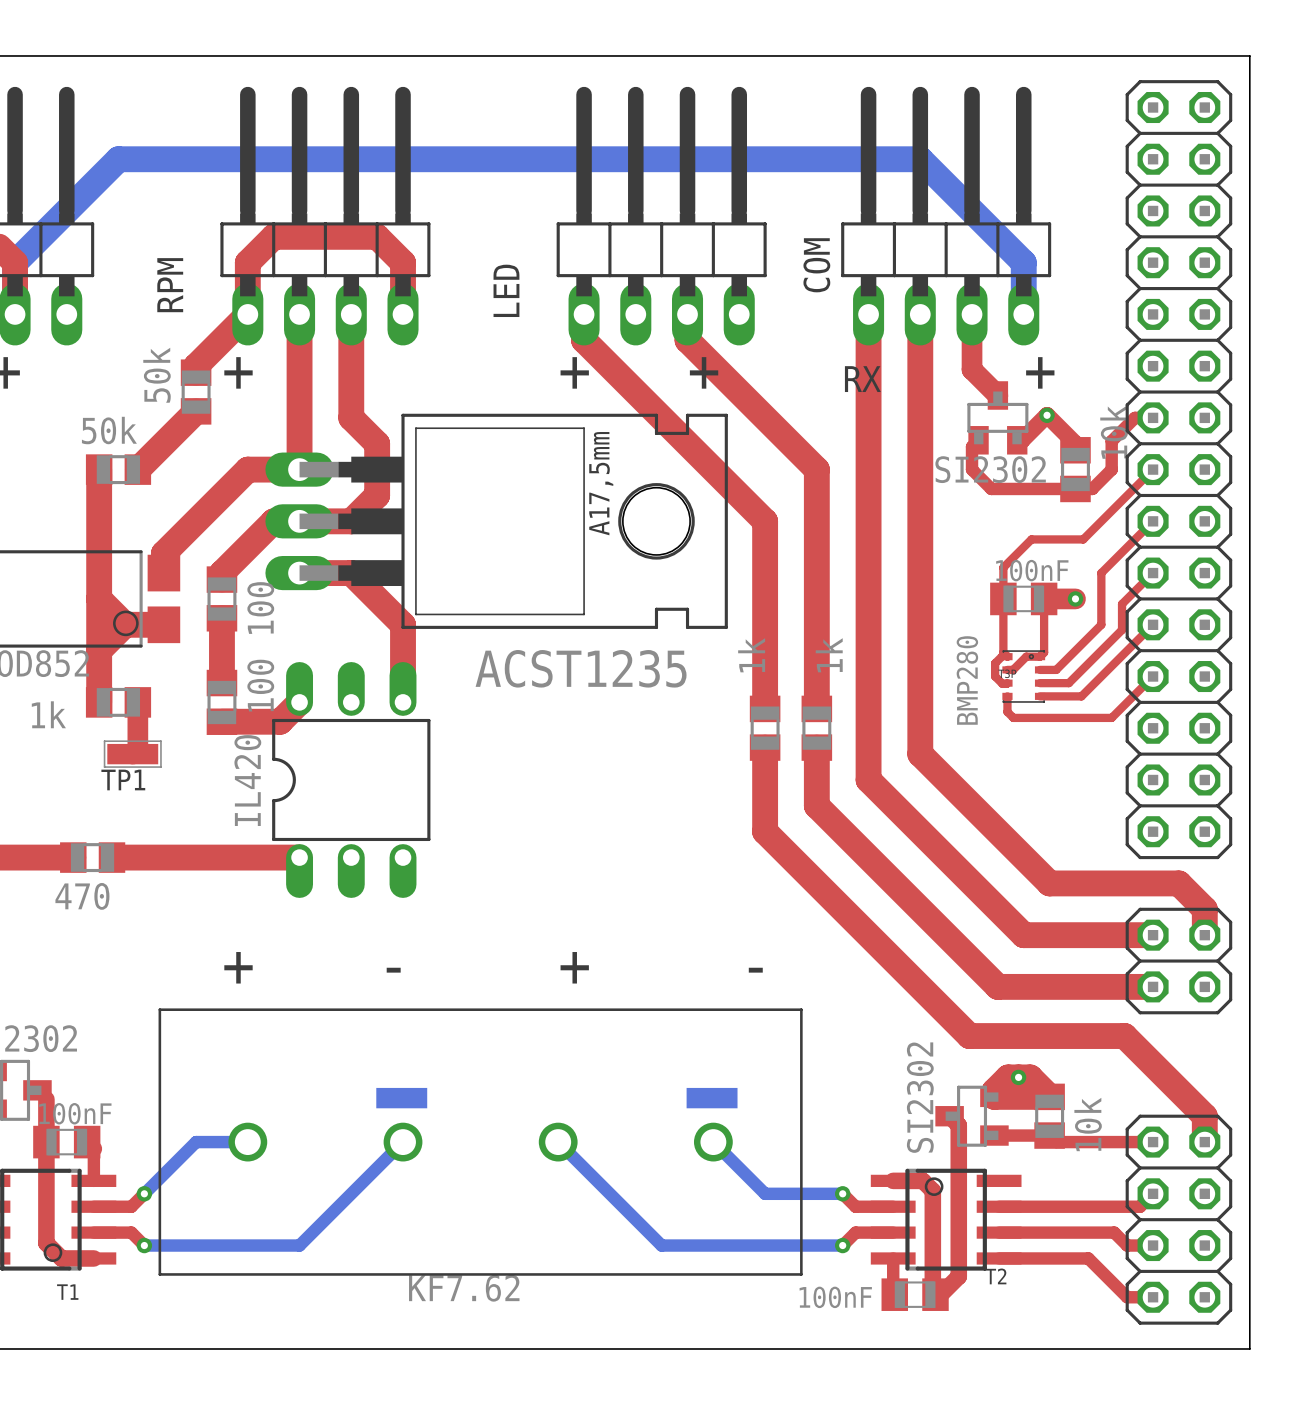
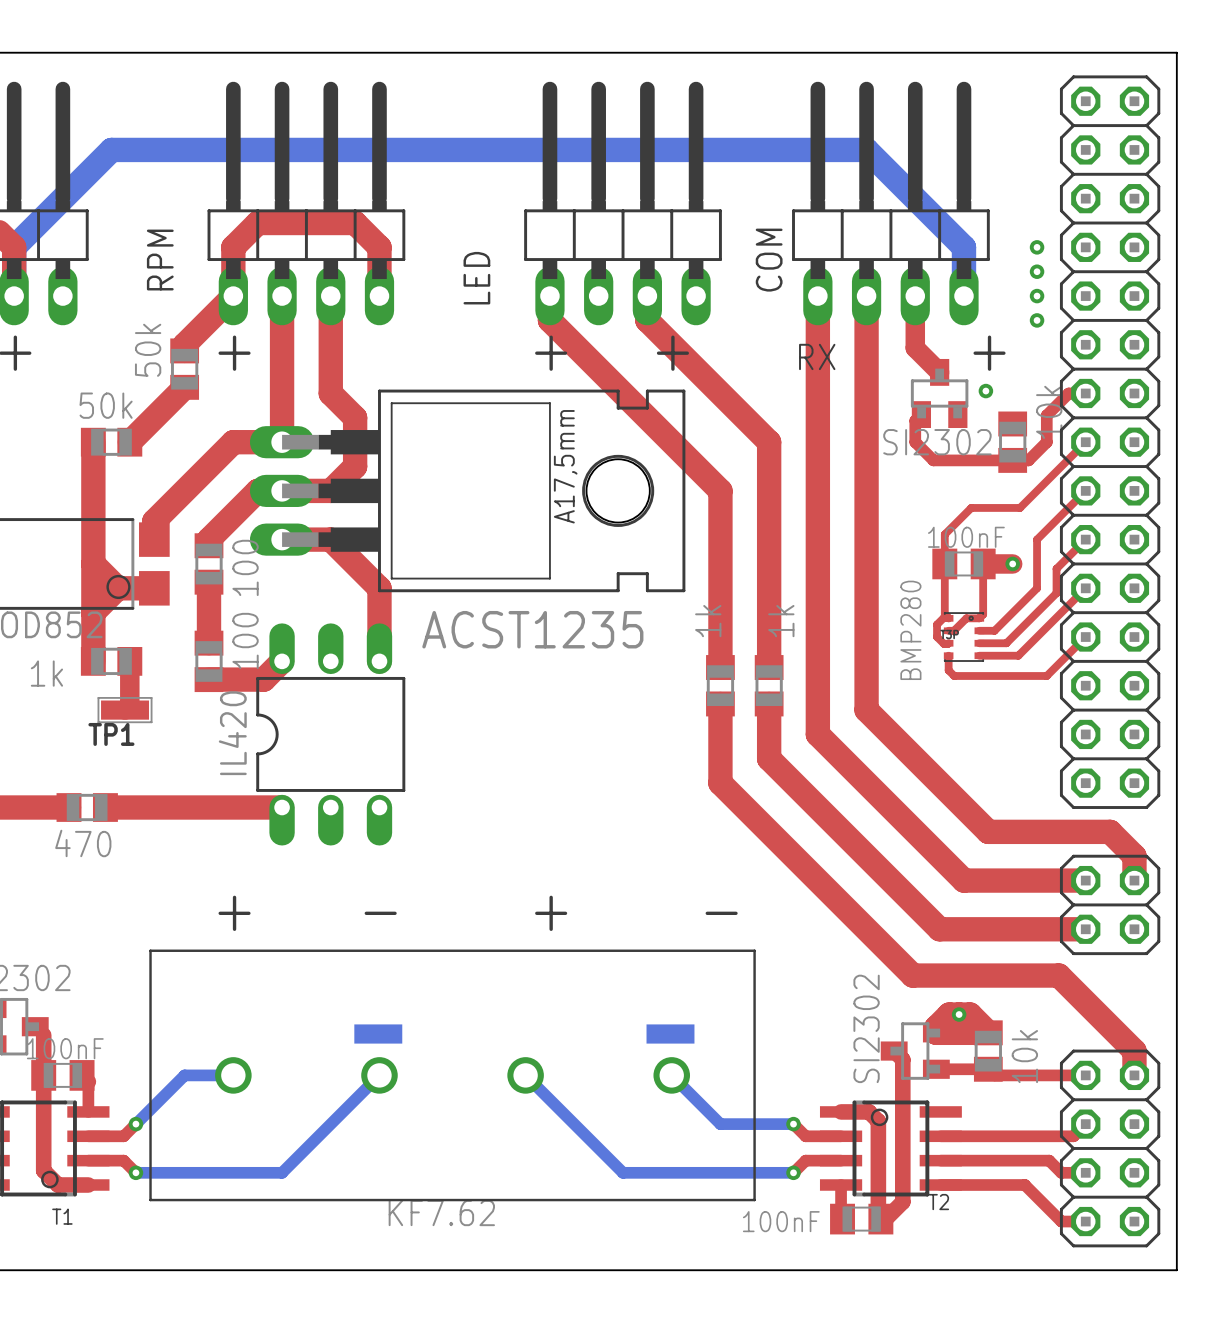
via: none -> (1037, 247)
via: none -> (1037, 271)
via: none -> (1037, 296)
via: none -> (1037, 320)
top track: (1017, 440) (1022, 440) (1047, 415) (1075, 443) (1075, 450) -> none

